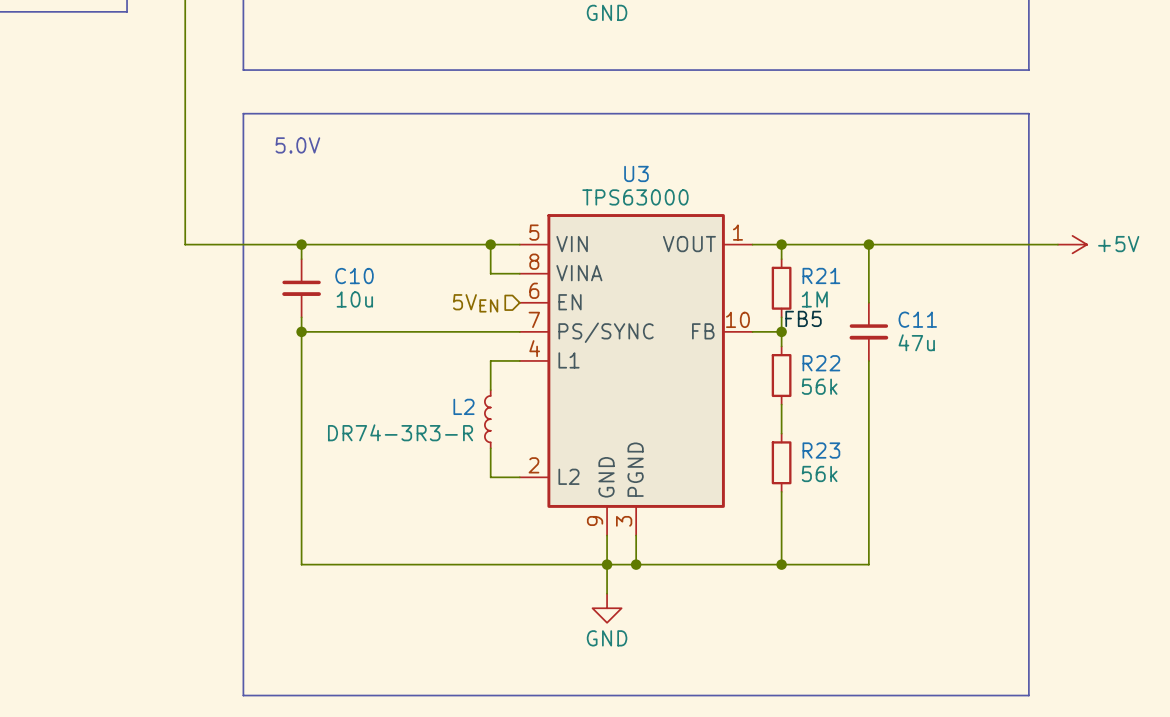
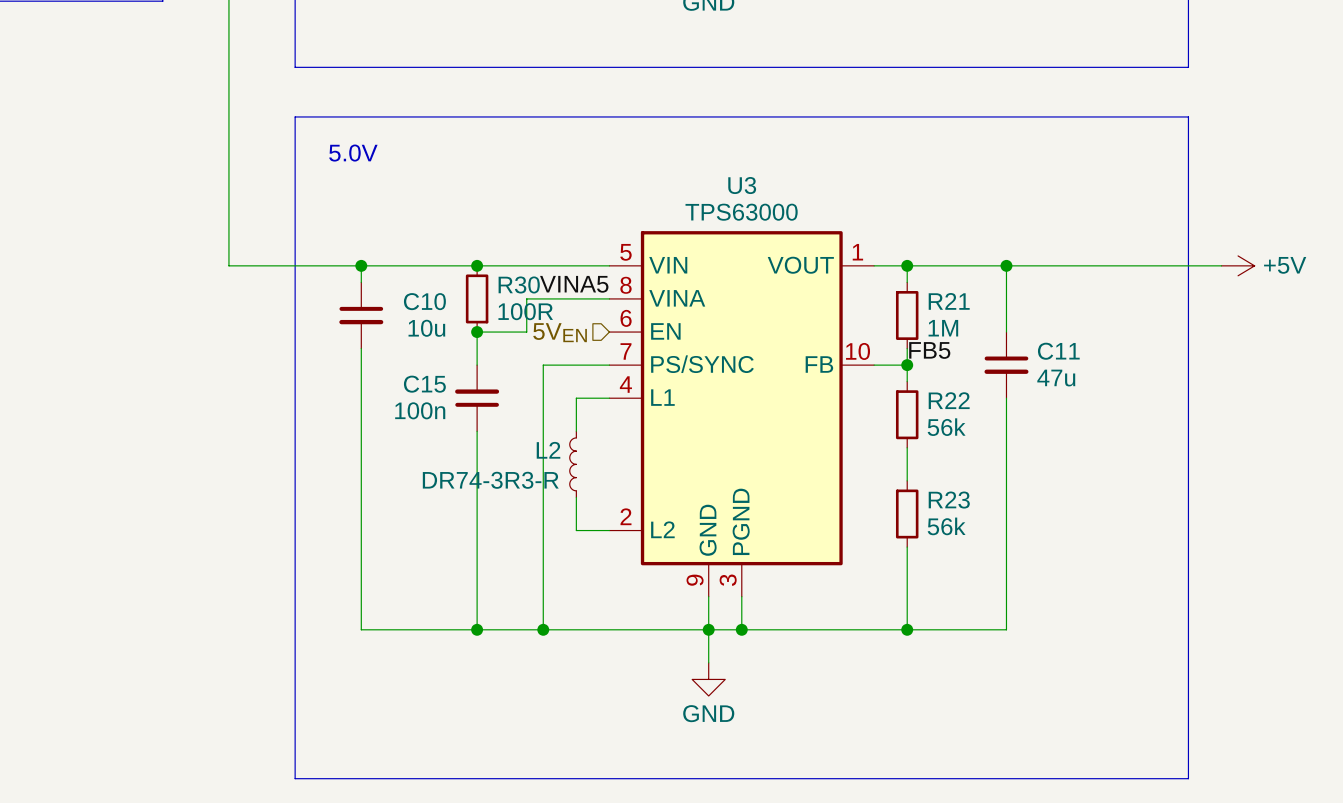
junction: none -> (477, 265)
wire: (490, 244) (490, 273) -> (477, 365) (477, 332) (526, 332) (526, 298) (576, 298)
junction: (490, 244) -> none
label: none -> VINA5 (574, 284)
R30: none -> 100R (477, 298)
junction: none -> (477, 332)
wire: (301, 331) (461, 331) -> (543, 629) (543, 365)
junction: (301, 331) -> none
C15: none -> 100n (477, 398)
wire: none -> (477, 431) (477, 629)
junction: none -> (477, 629)
junction: none -> (543, 629)

